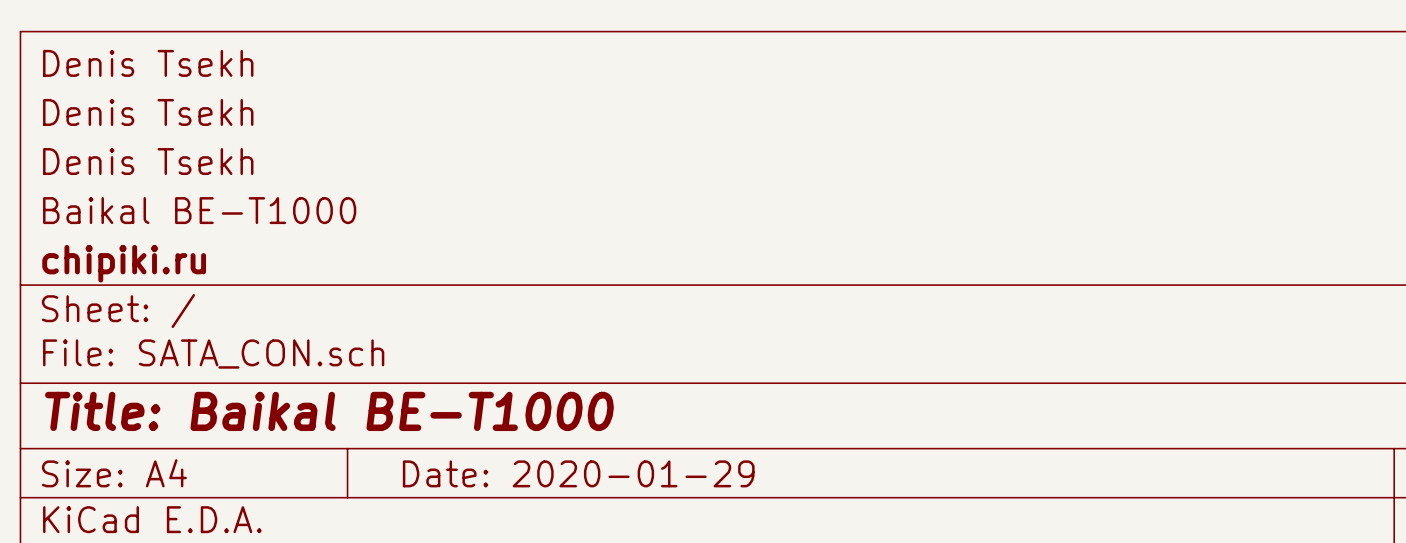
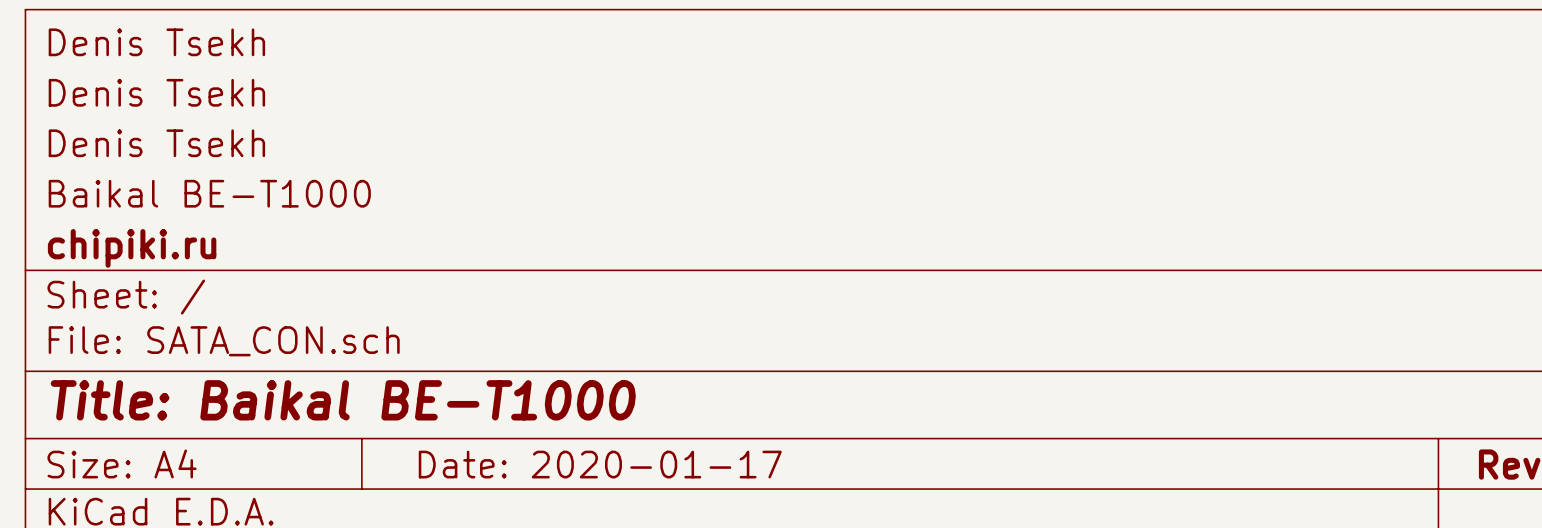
title block: Date: 2020-01-29 (578, 473) -> Date: 2020-01-17 (600, 464)

